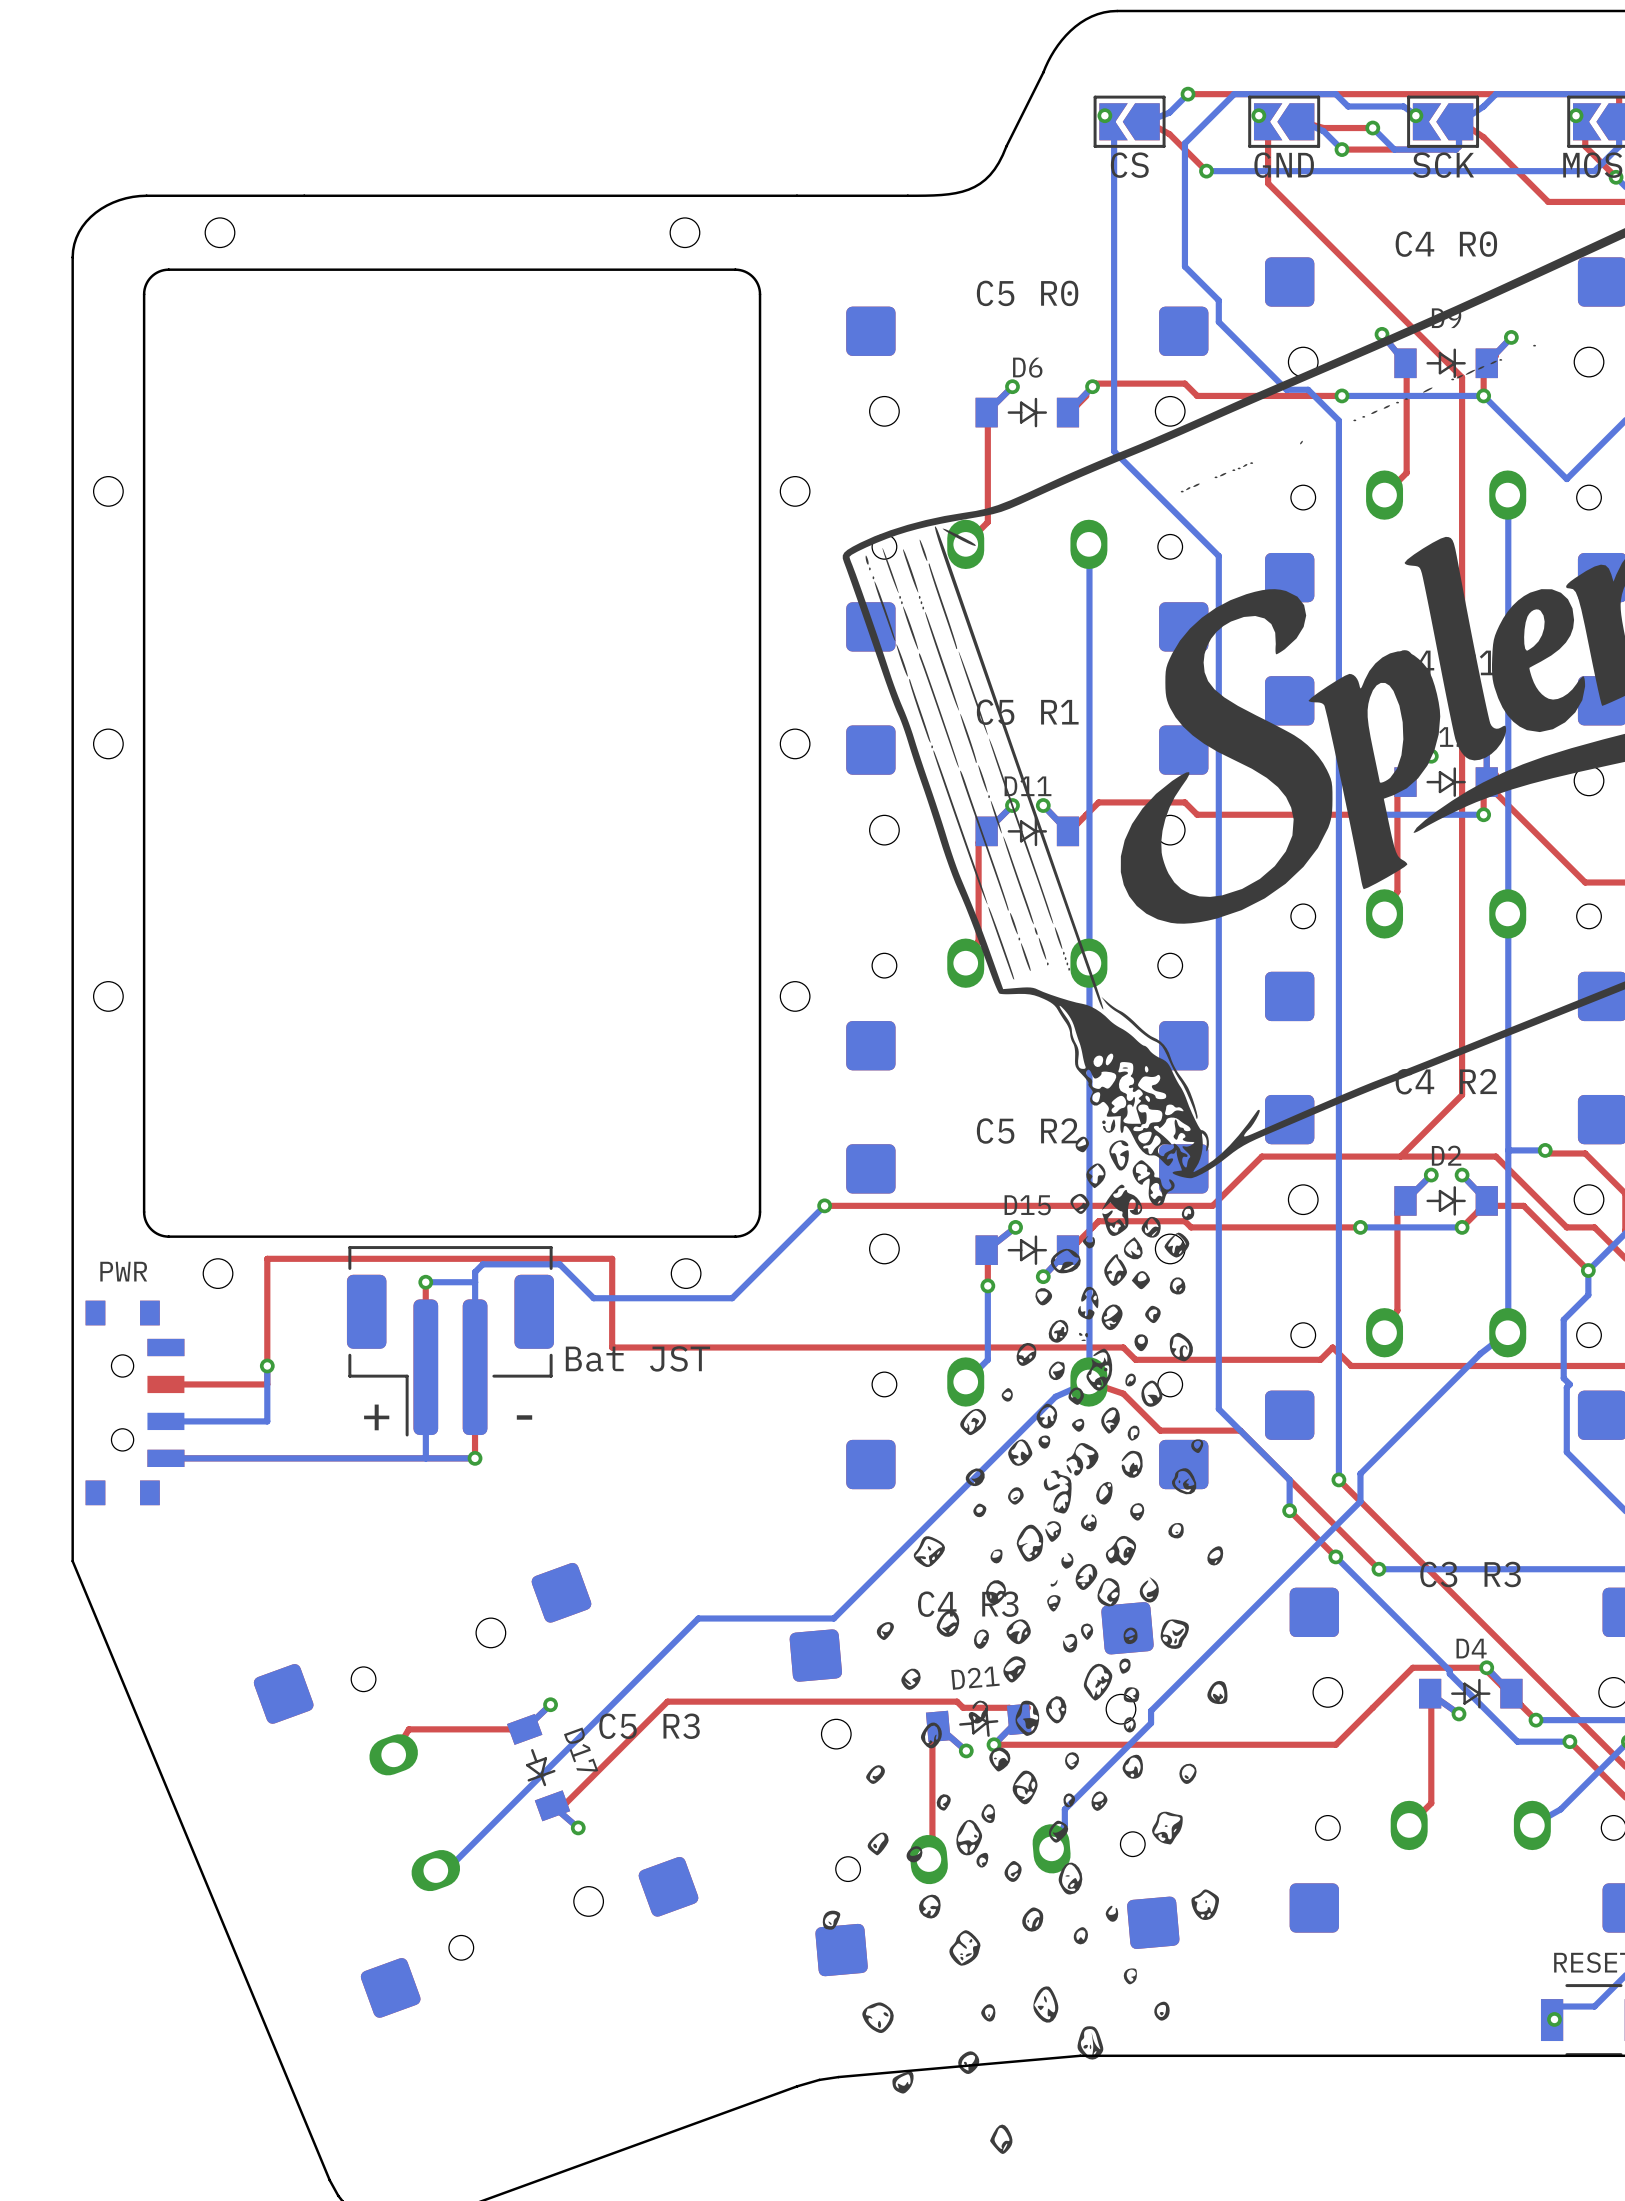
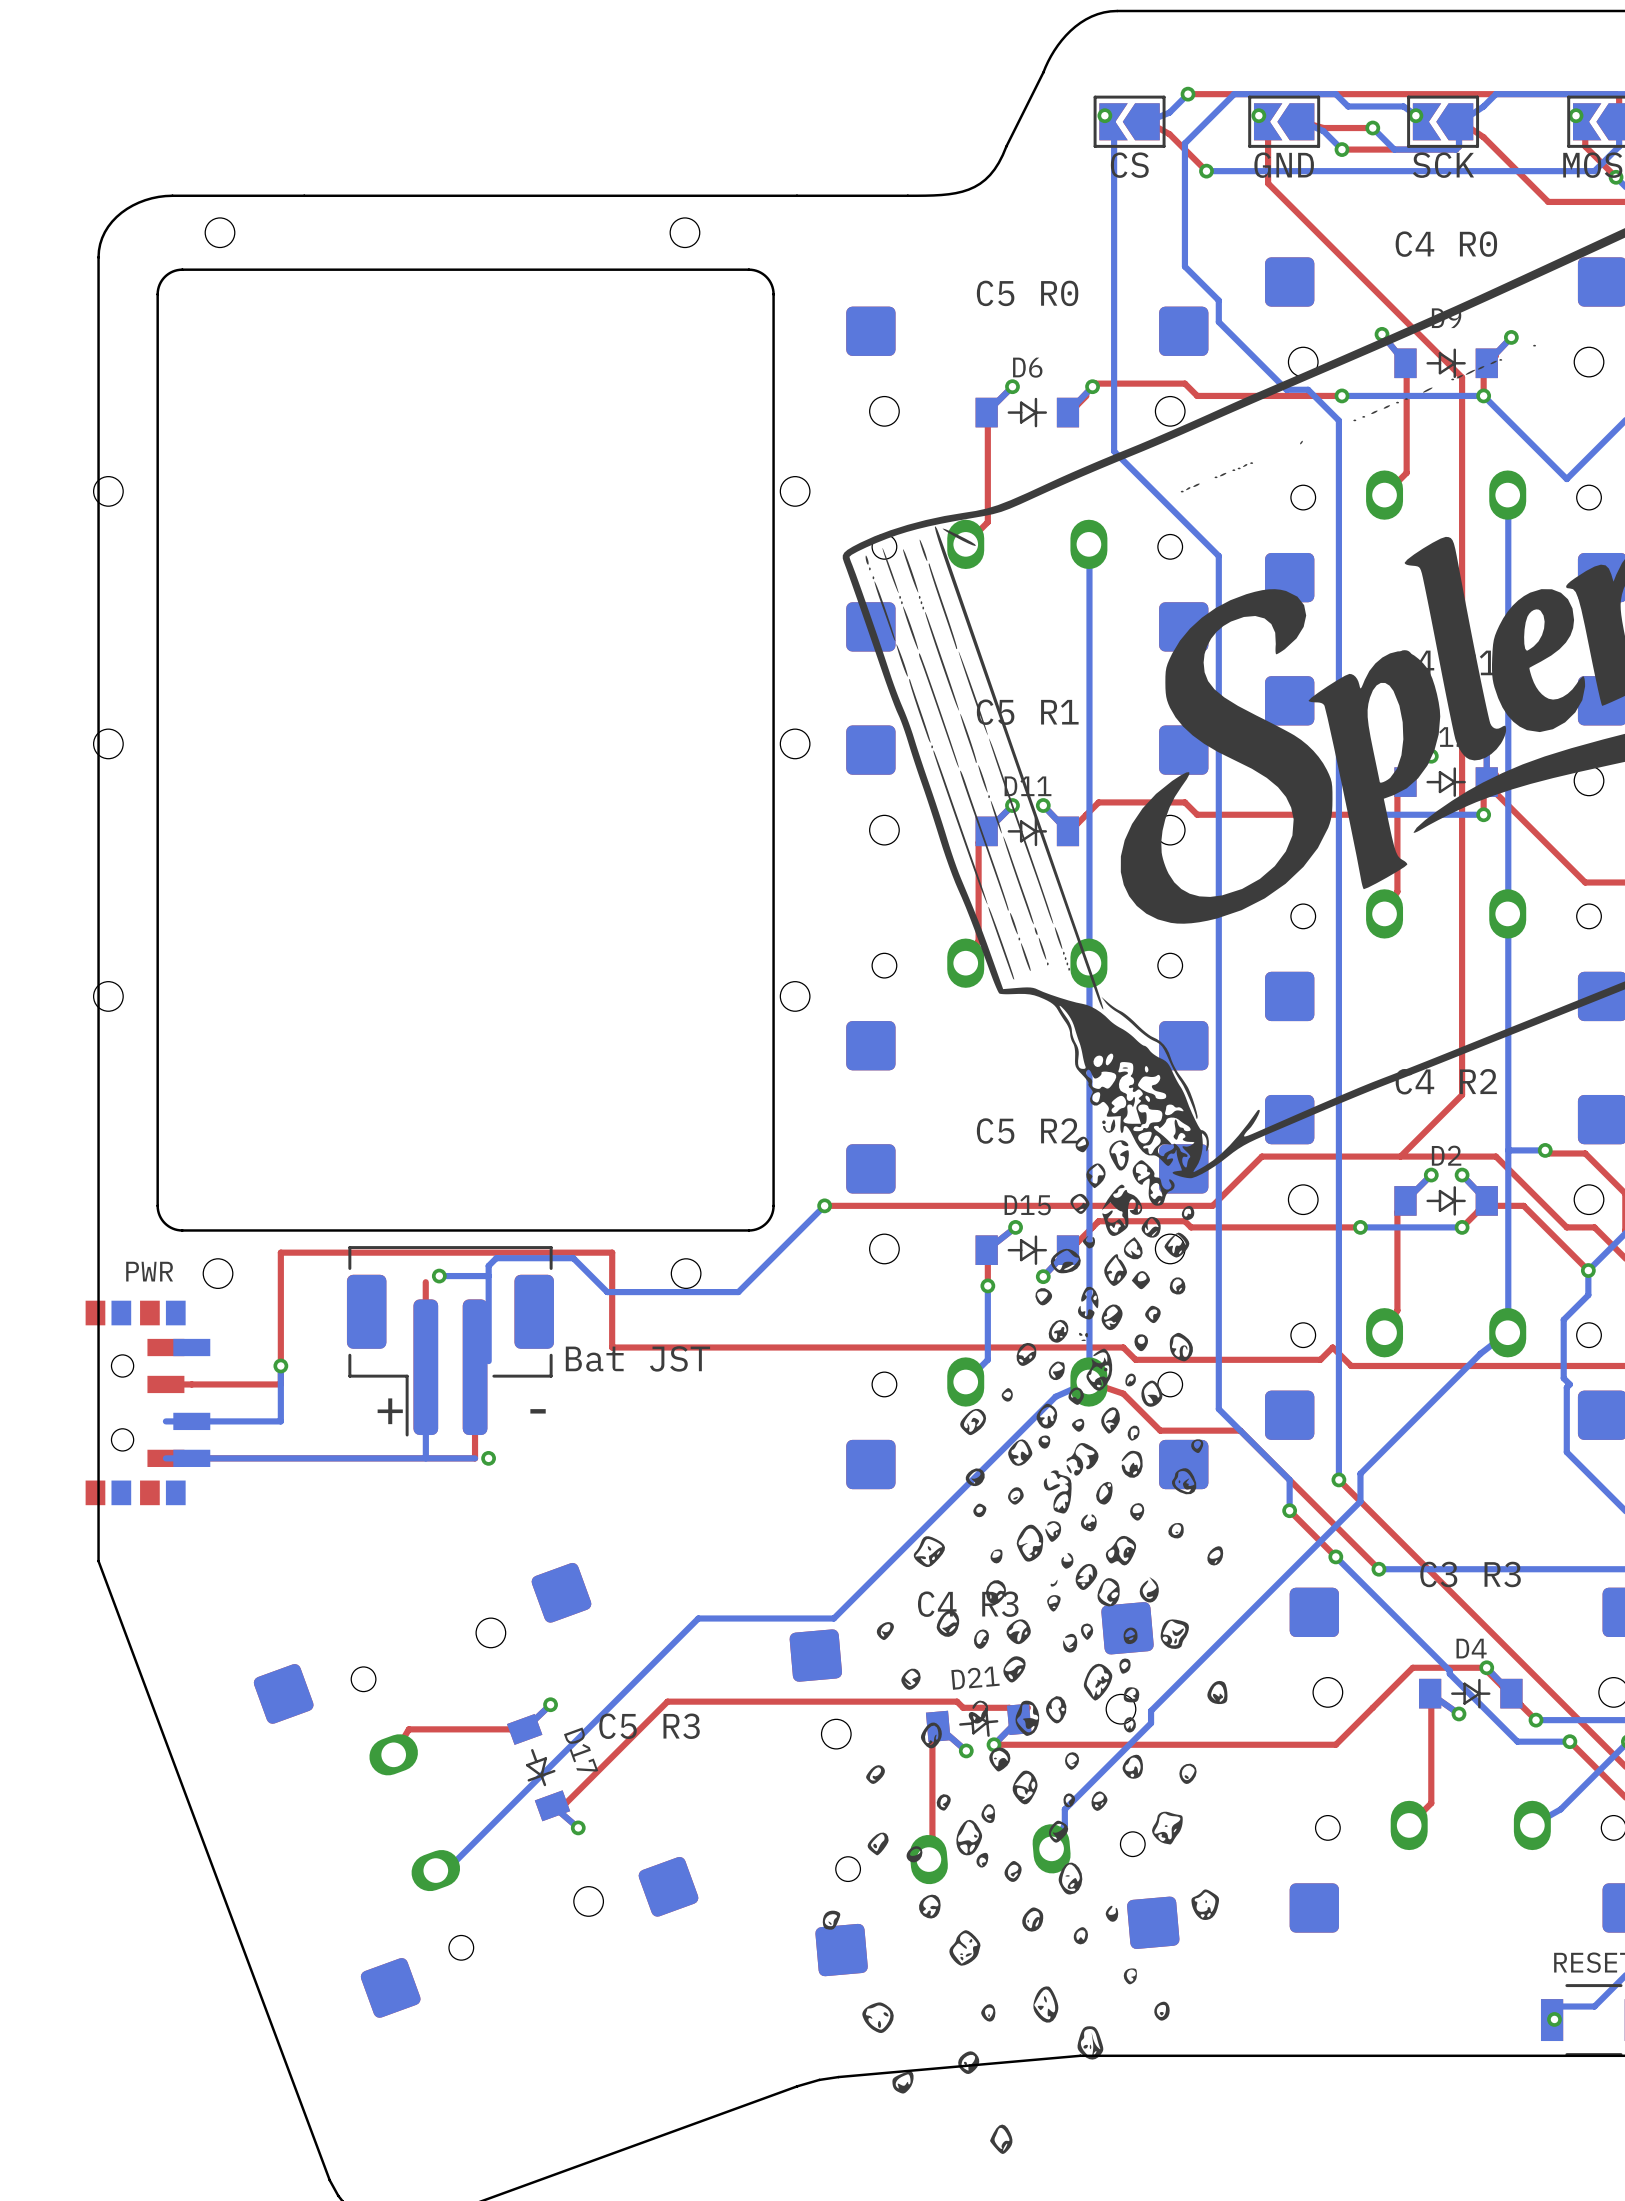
board edge: (172, 195) (132, 196) (106, 205) (90, 216) (82, 226) (76, 237) (73, 250) (72, 1561) (329, 2180) -> (172, 195) (145, 200) (121, 212) (104, 232) (100, 244) (98, 257) (98, 1561) (329, 2180)
board edge: (735, 269) (744, 271) (752, 276) (758, 284) (760, 294) (760, 1212) (757, 1223) (747, 1233) (735, 1236) (168, 1236) (159, 1234) (151, 1229) (146, 1221) (144, 1212) (144, 294) (147, 282) (154, 273) (163, 270) (182, 269) -> (735, 269) (753, 270) (762, 273) (770, 282) (773, 294) (773, 1205) (771, 1215) (766, 1223) (758, 1228) (748, 1230) (182, 1230) (170, 1227) (160, 1217) (157, 1205) (157, 294) (159, 284) (164, 276) (172, 271) (182, 269)
top track: (612, 1258) (267, 1258) (267, 1384) -> (612, 1258) (612, 1252) (280, 1252) (280, 1384) (267, 1384)
via position: (425, 1282) -> (439, 1276)
bottom track: (475, 1282) (425, 1282) -> (488, 1276) (439, 1276)
bottom track: (738, 1292) (732, 1298) (593, 1298) (559, 1264) (482, 1264) (475, 1272) (475, 1367) -> (738, 1292) (607, 1292) (573, 1258) (496, 1258) (488, 1265) (488, 1361)
bottom track: (267, 1365) (267, 1421) -> (280, 1365) (280, 1421) (267, 1421)
via position: (267, 1365) -> (280, 1365)
PWR position: (135, 1402) -> (160, 1402)
text position: + (376, 1417) -> + (390, 1411)
text position: - (524, 1417) -> - (538, 1411)
via position: (475, 1458) -> (488, 1458)

